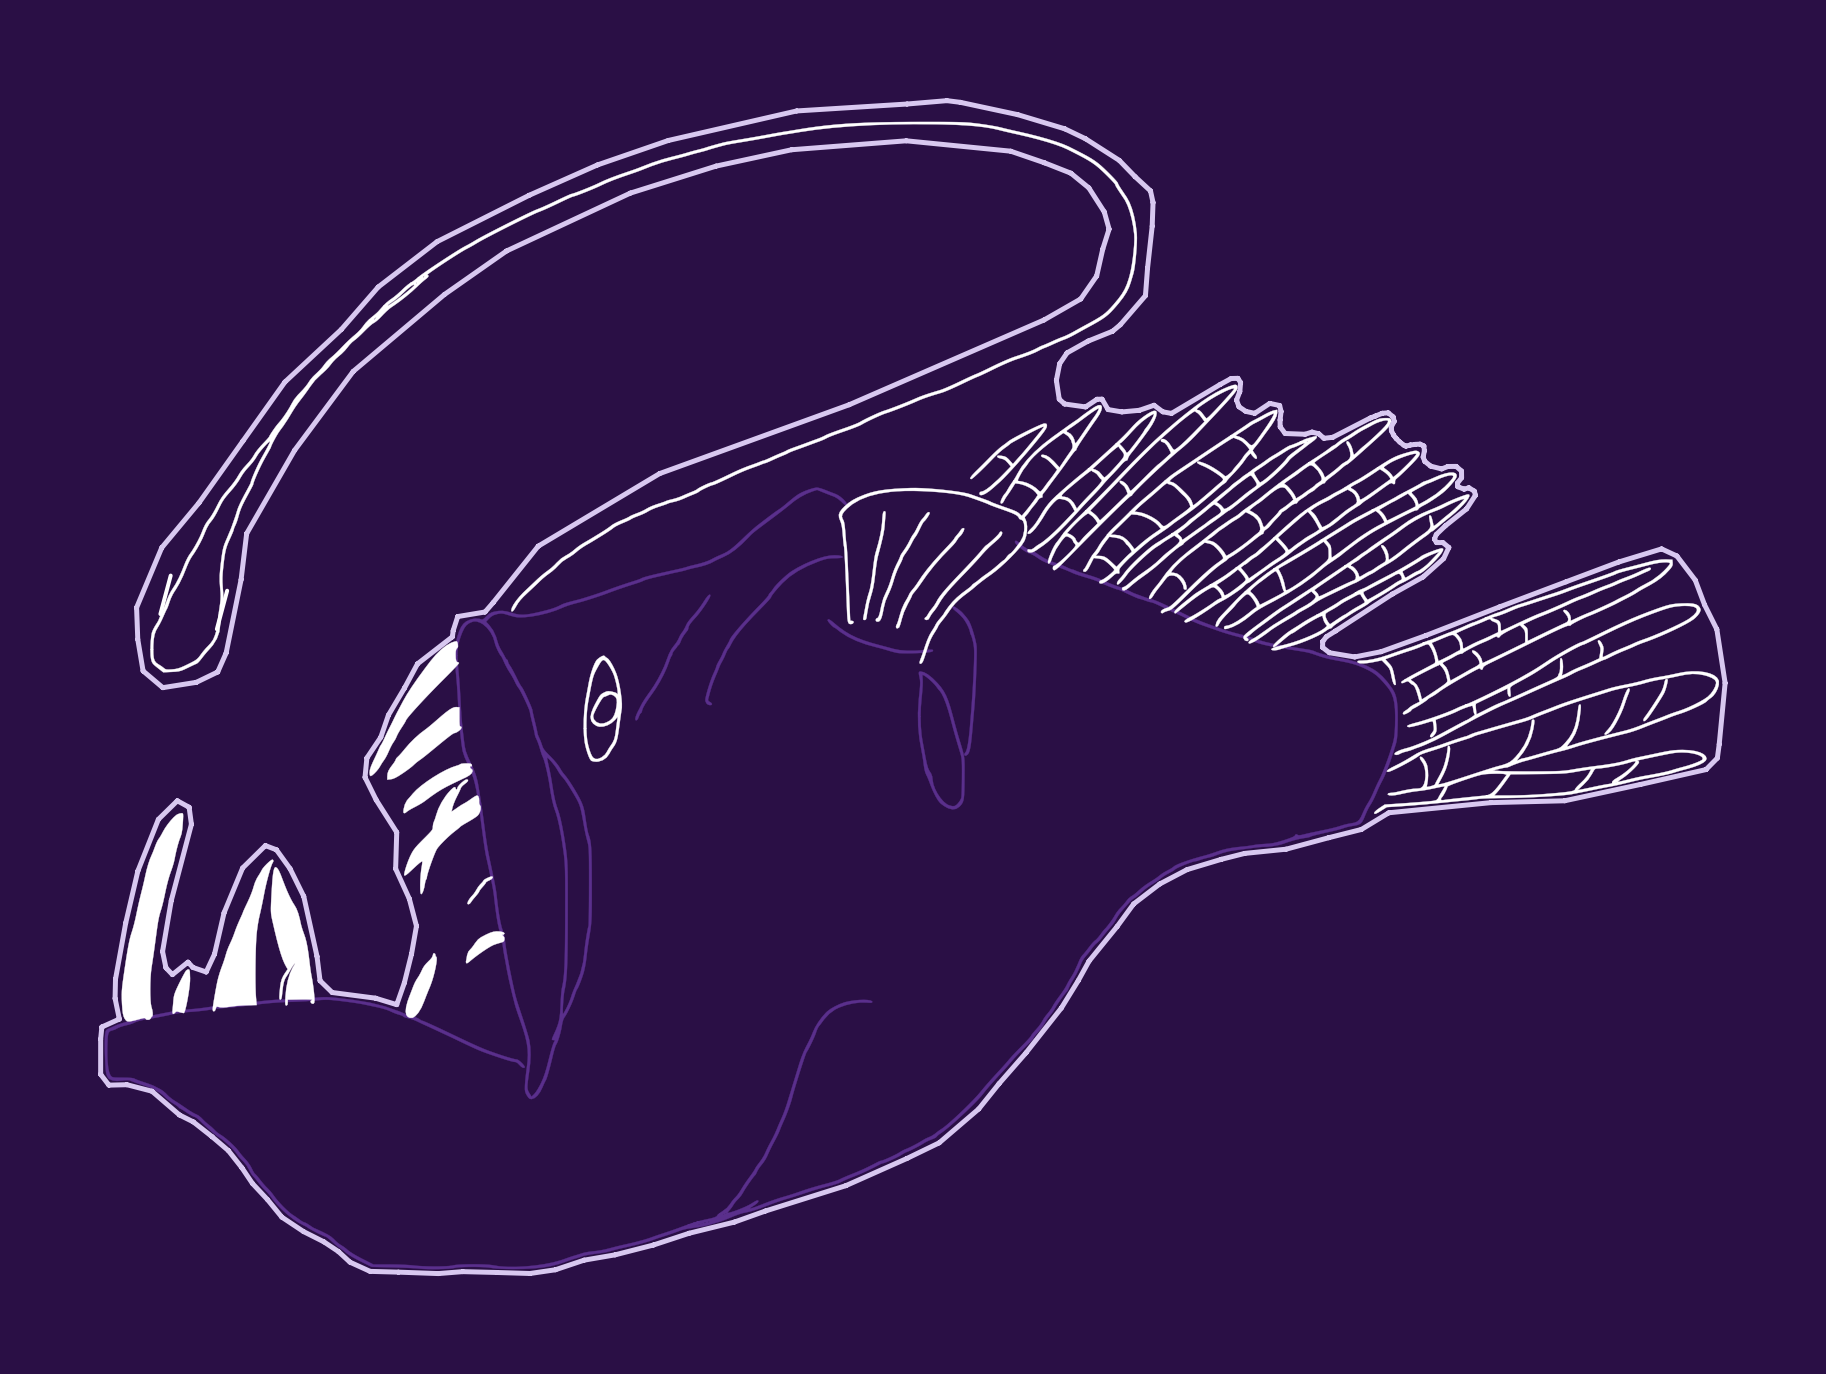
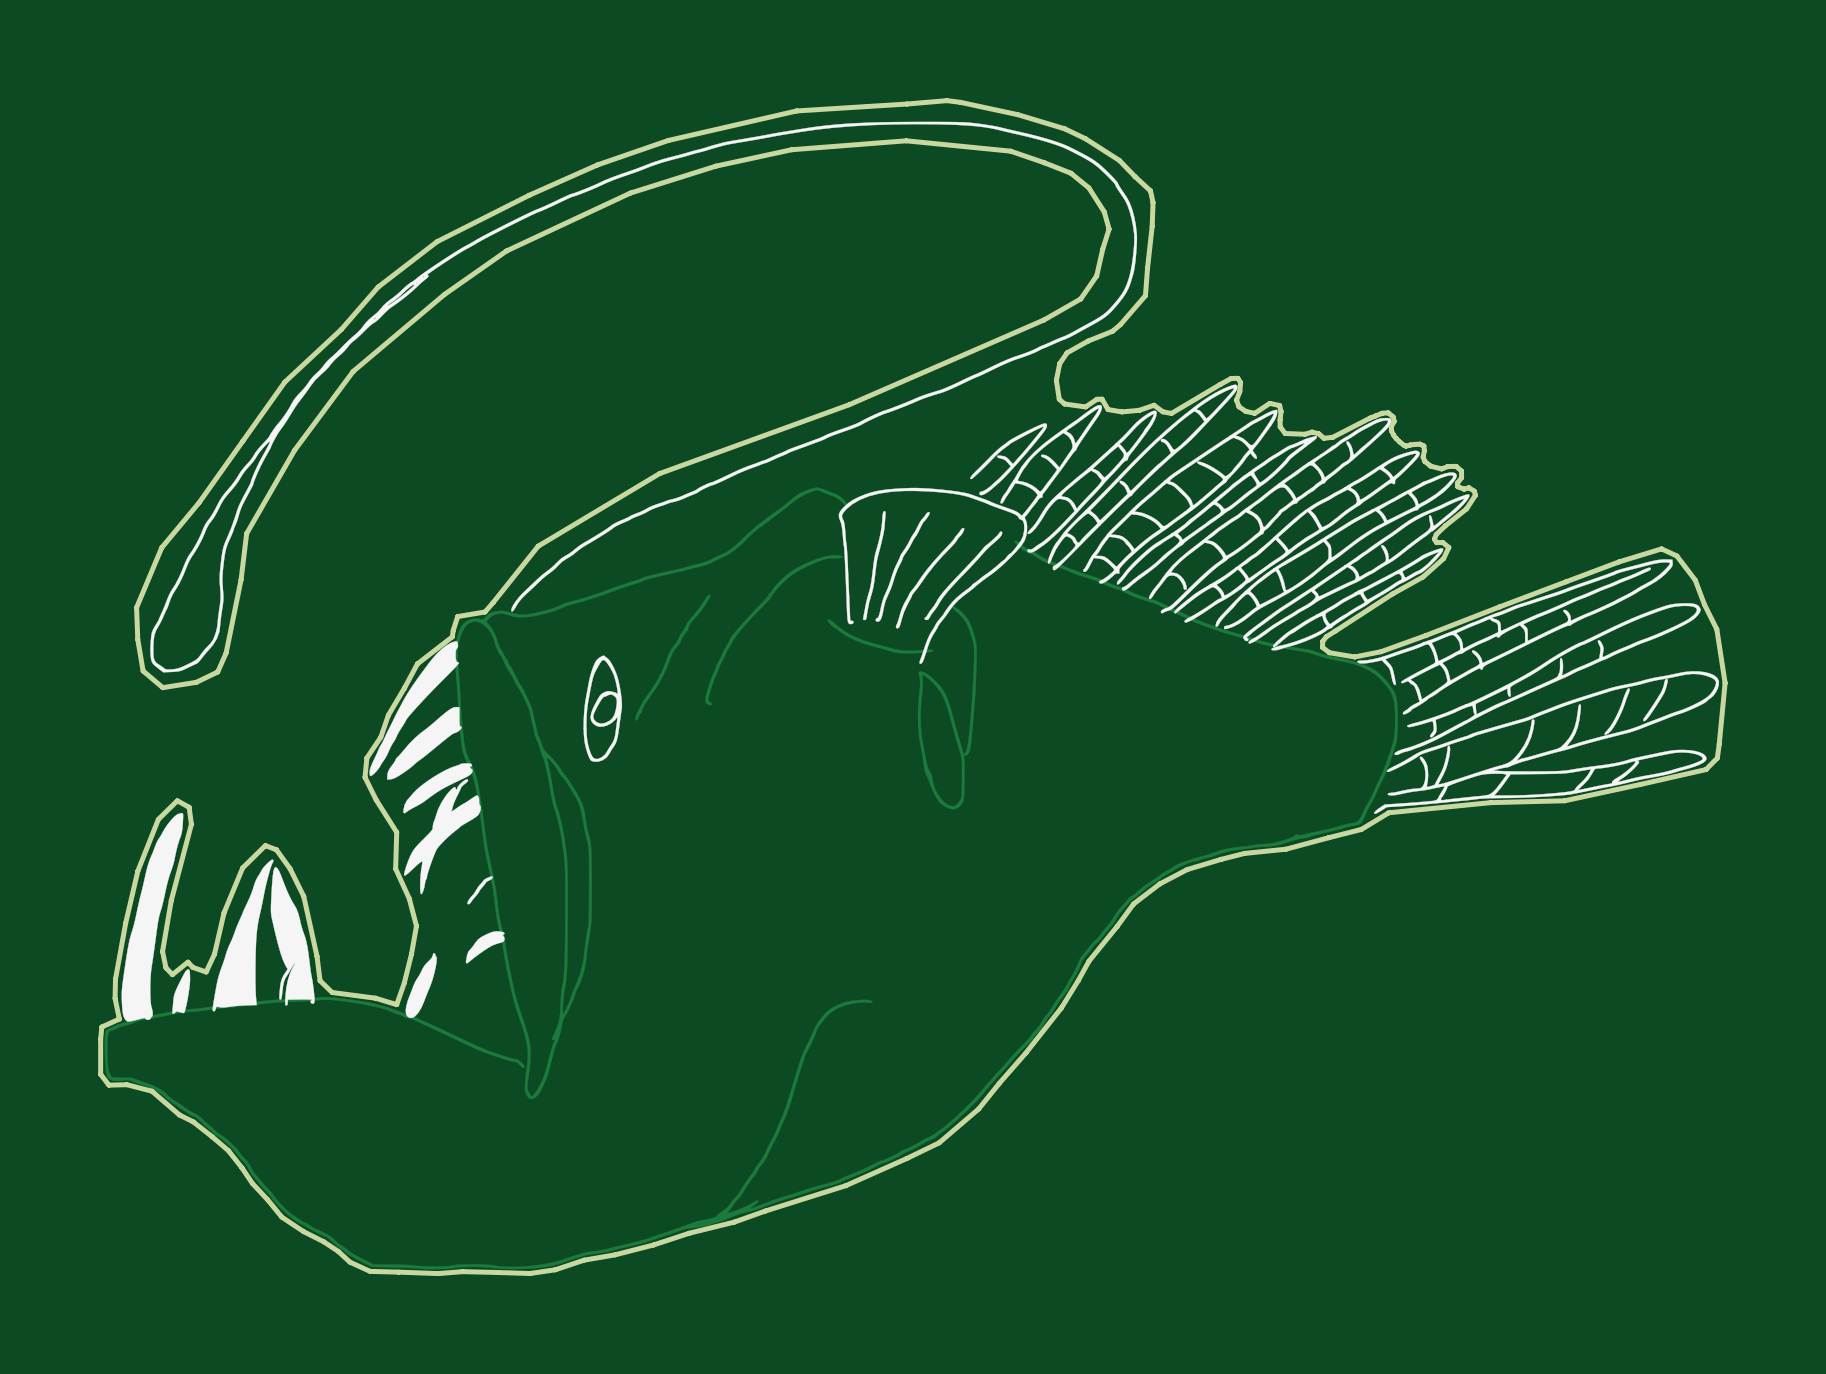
part: (193, 602) -> none

